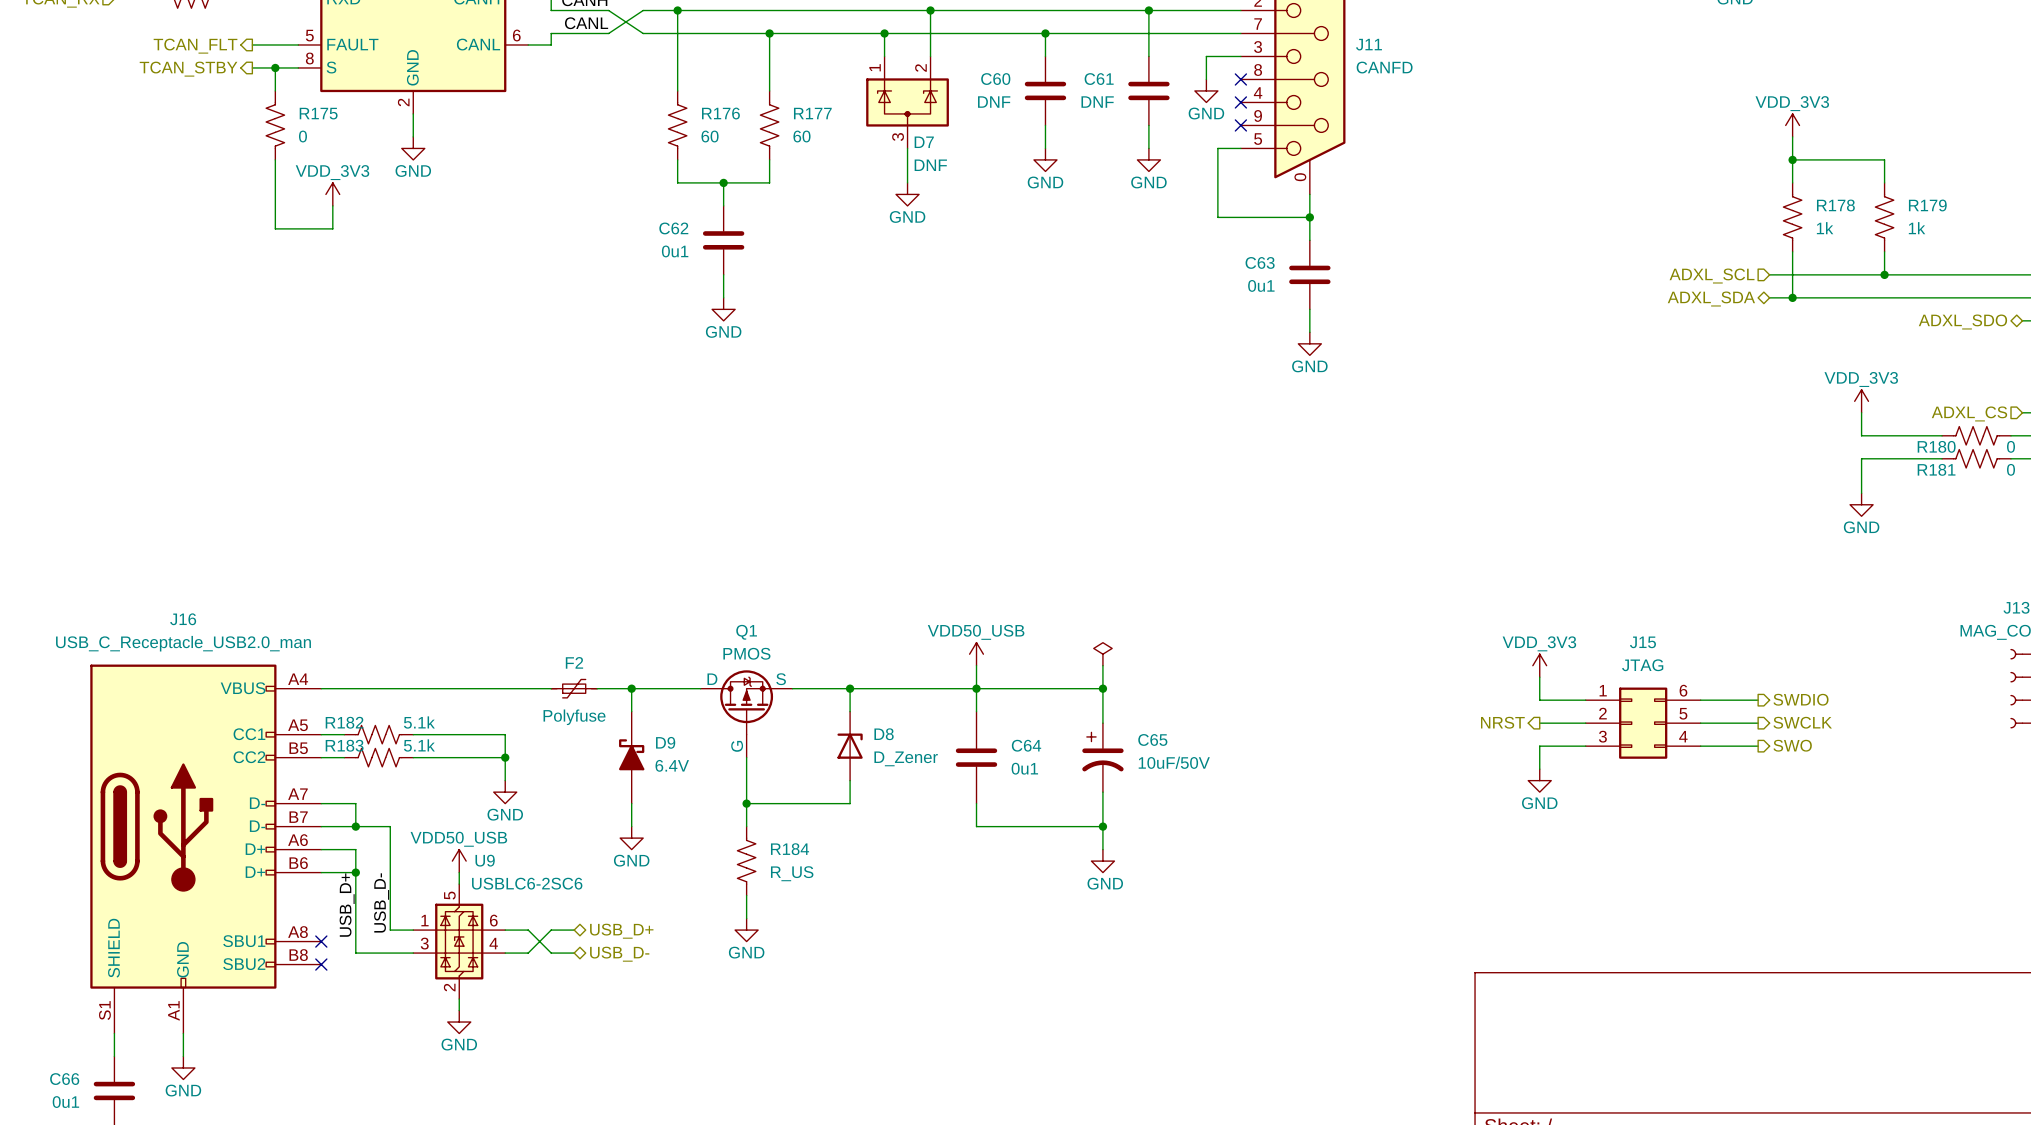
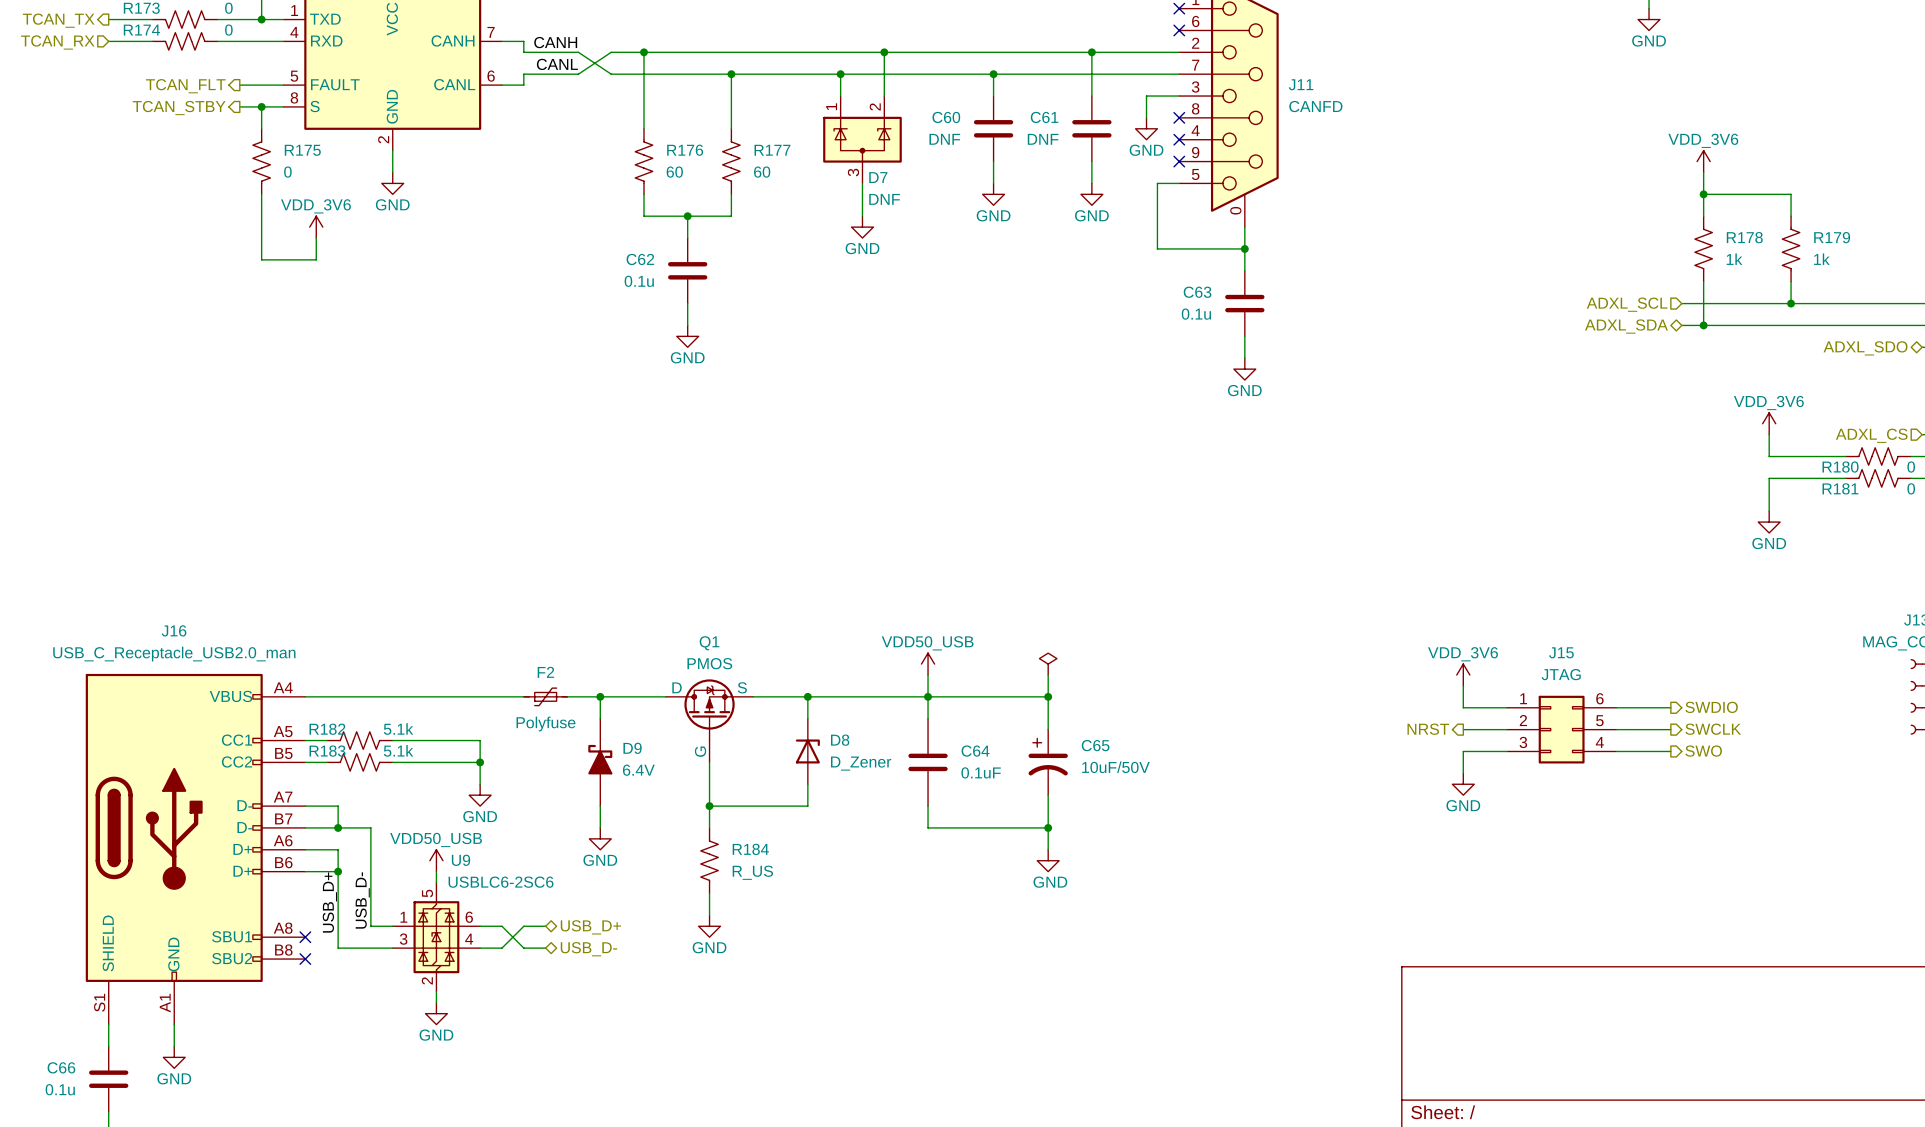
power symbol: VDD_3V3 (1792, 125) -> VDD_3V6 (1703, 161)
power symbol: VDD_3V3 (332, 194) -> VDD_3V6 (316, 227)
C62 value: 0u1 (675, 251) -> 0.1u (639, 281)
C63 value: 0u1 (1261, 285) -> 0.1u (1196, 314)
power symbol: VDD_3V3 (1861, 401) -> VDD_3V6 (1769, 423)
power symbol: VDD_3V3 (1539, 665) -> VDD_3V6 (1463, 675)
C64 value: 0u1 (1024, 768) -> 0.1uF (981, 772)
C66 value: 0u1 (65, 1102) -> 0.1u (60, 1089)

